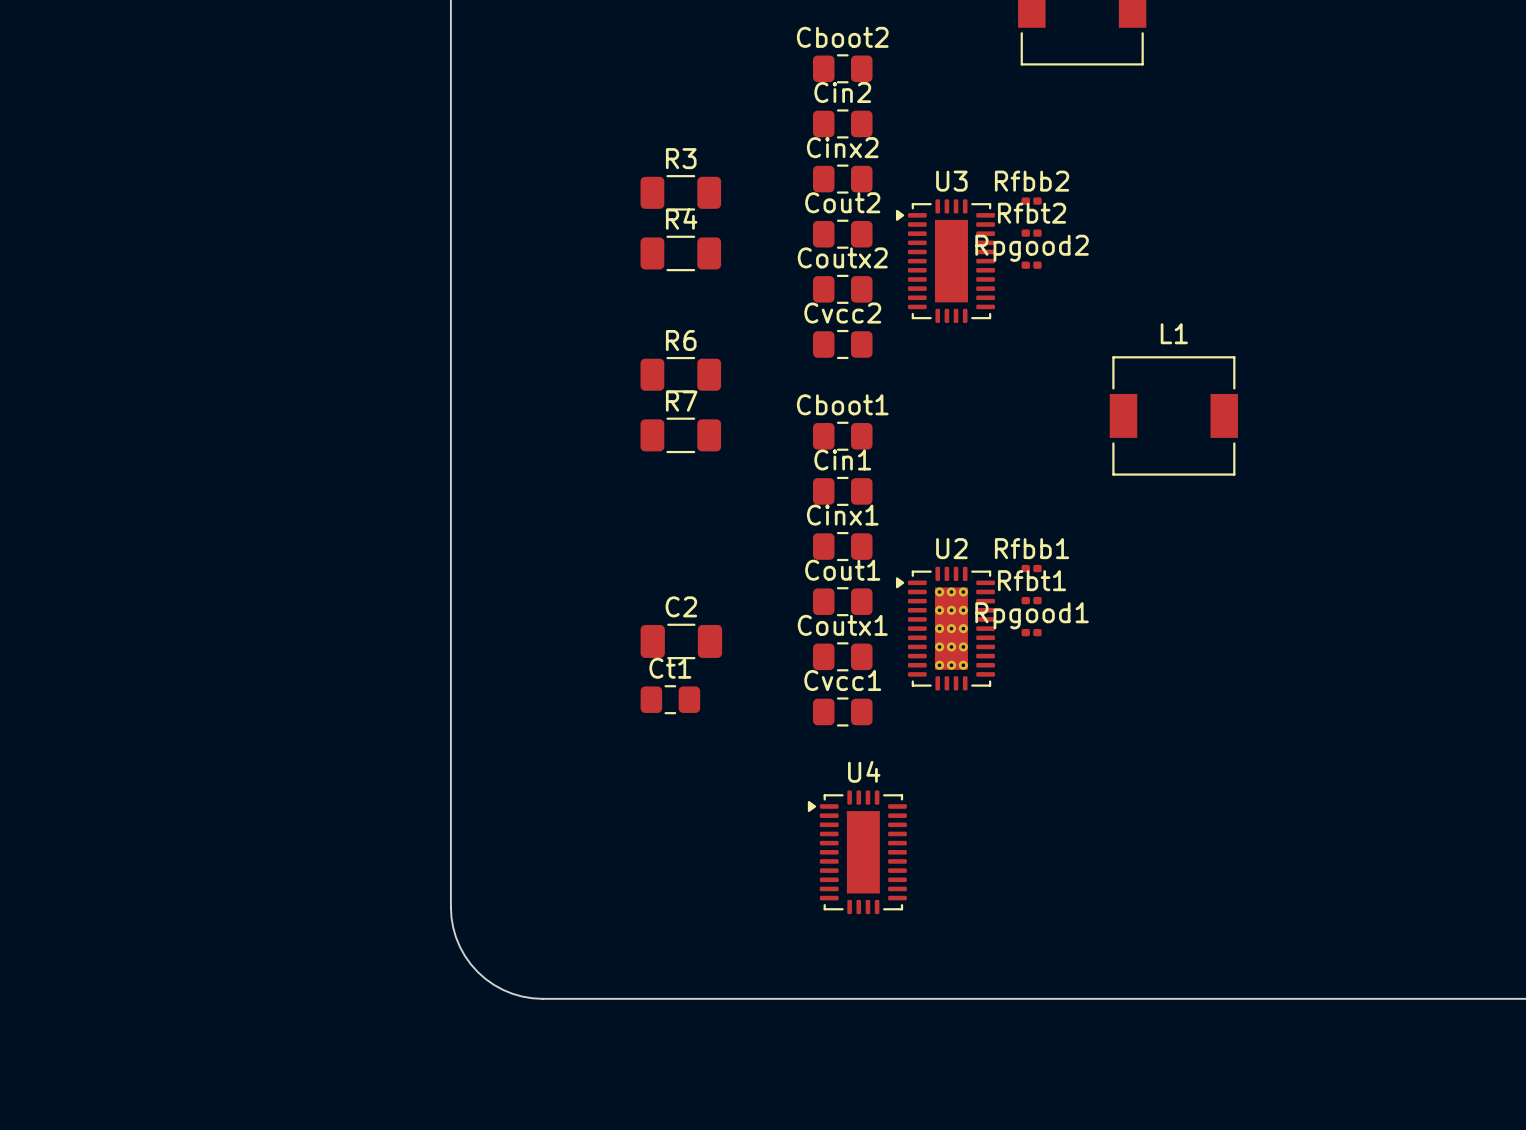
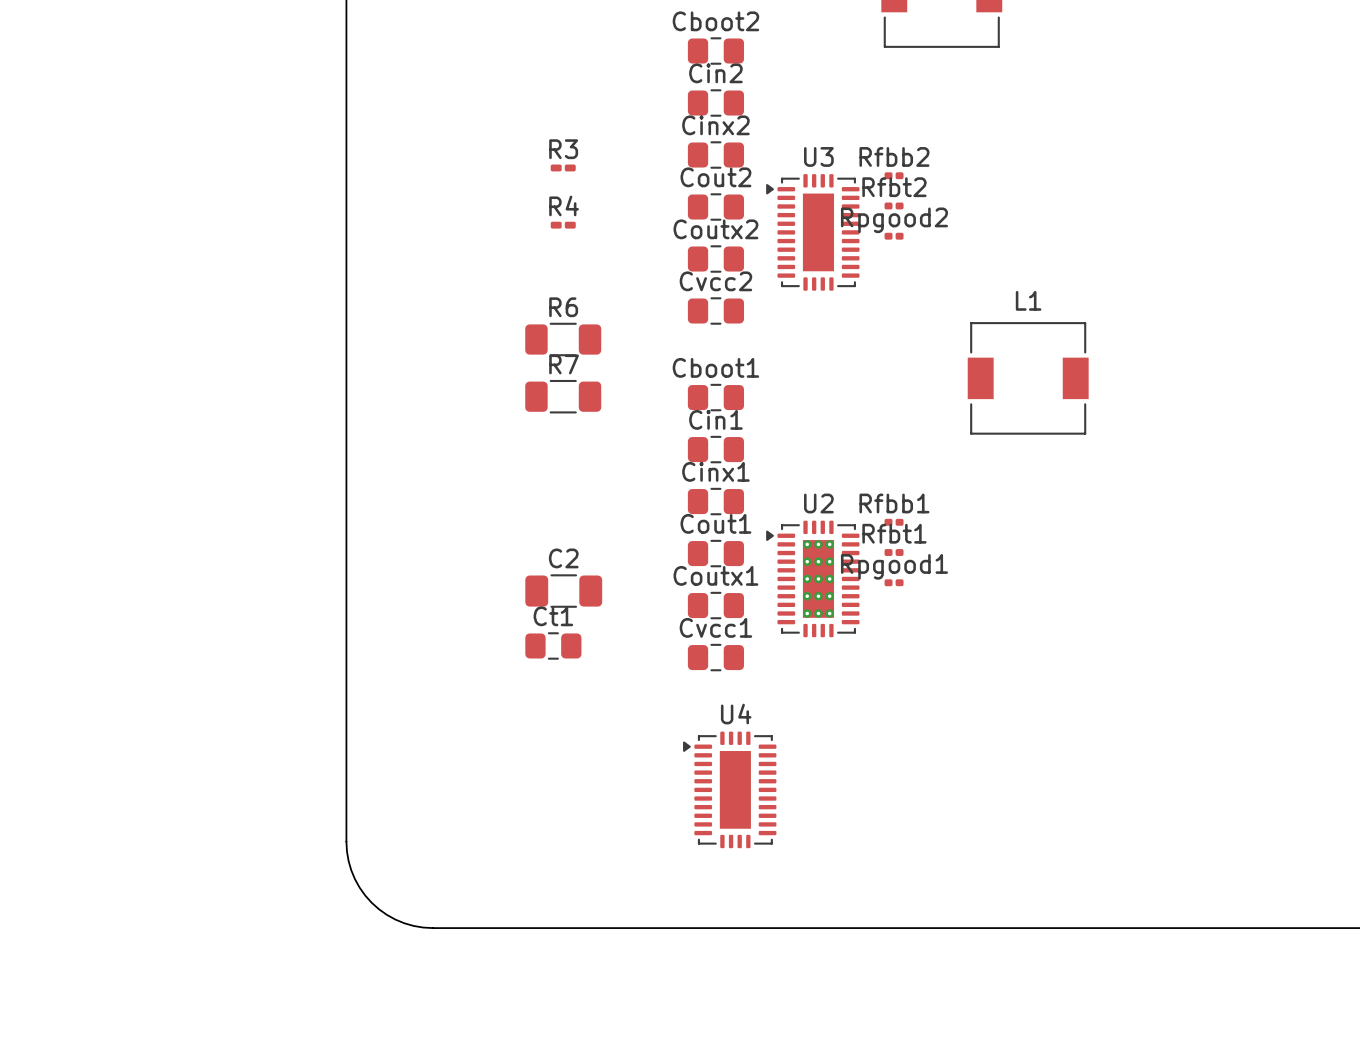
R3 footprint: [640, 175, 722, 211] -> [550, 164, 576, 172]
R4 footprint: [640, 235, 722, 272] -> [550, 221, 576, 229]

